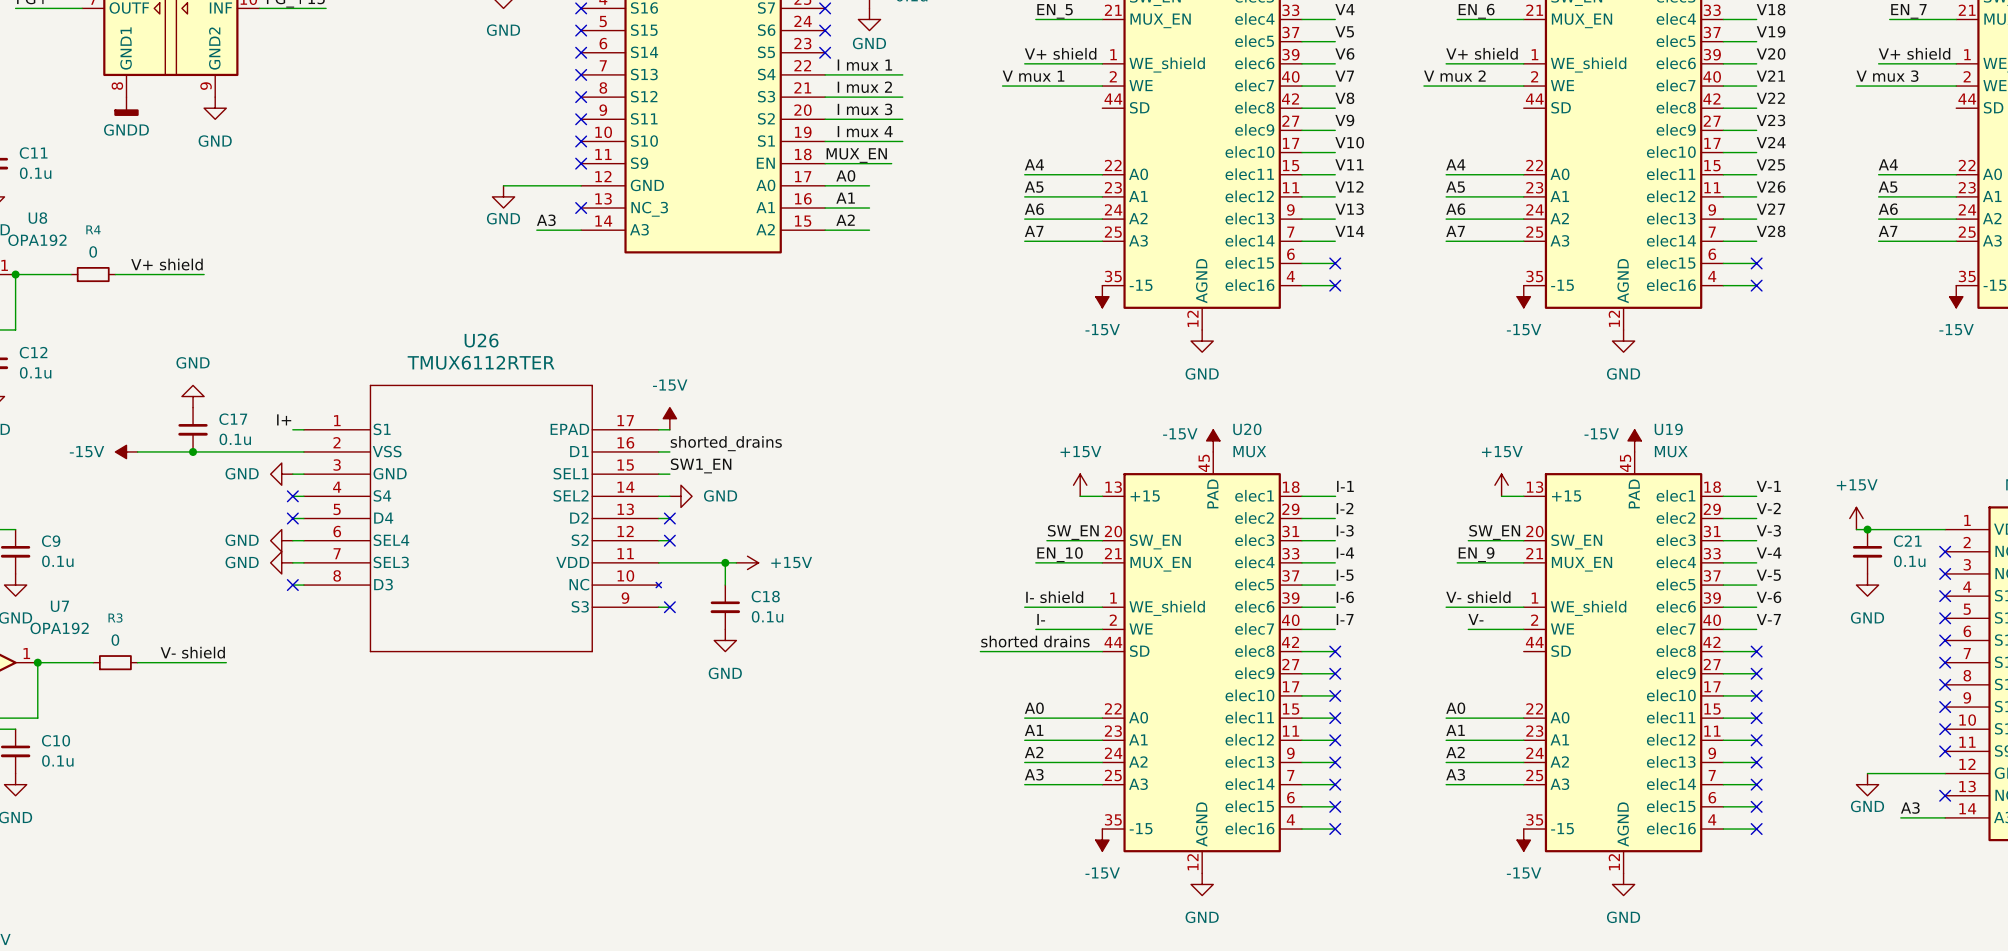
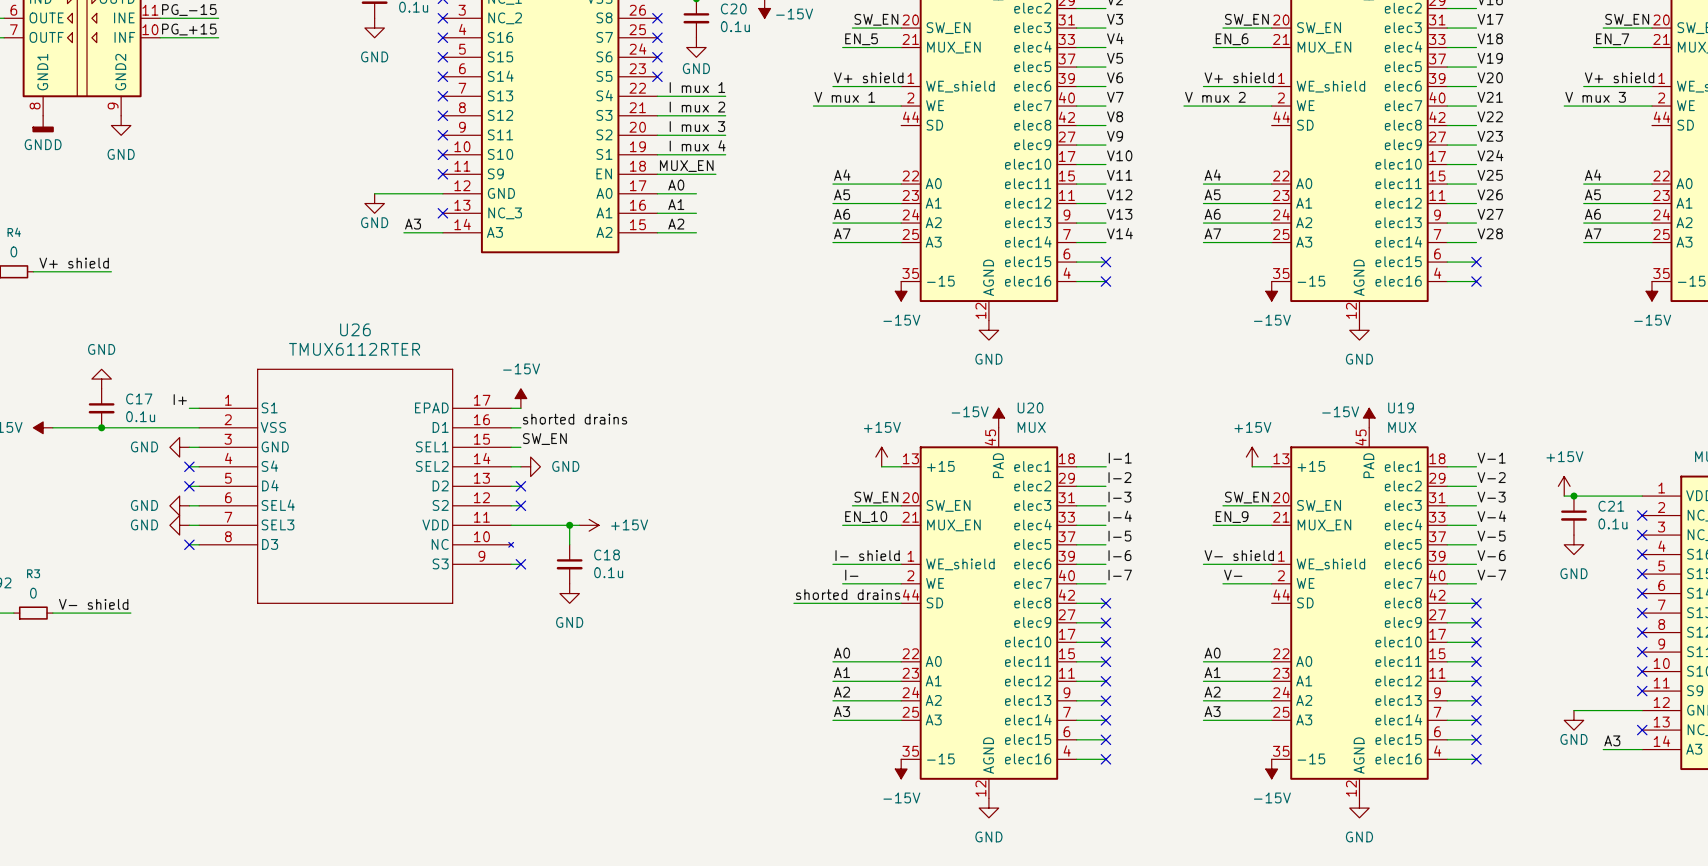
label: shorted_drains (726, 443) -> shorted drains (575, 419)
label: SW1_EN (701, 465) -> SW_EN (544, 439)

